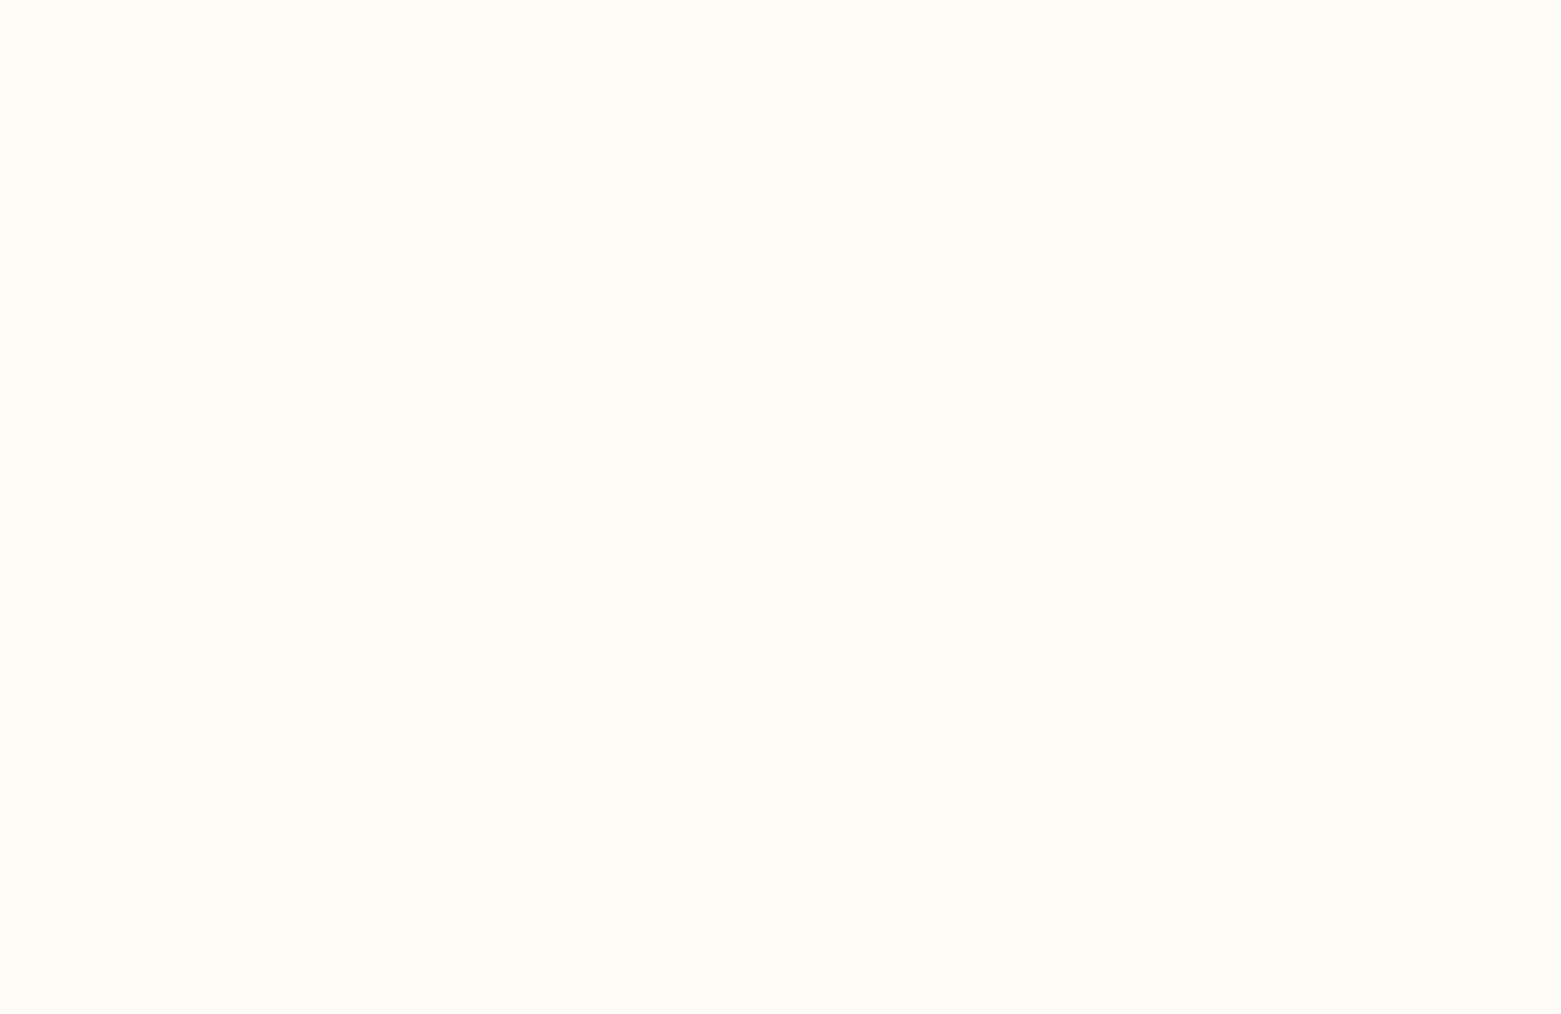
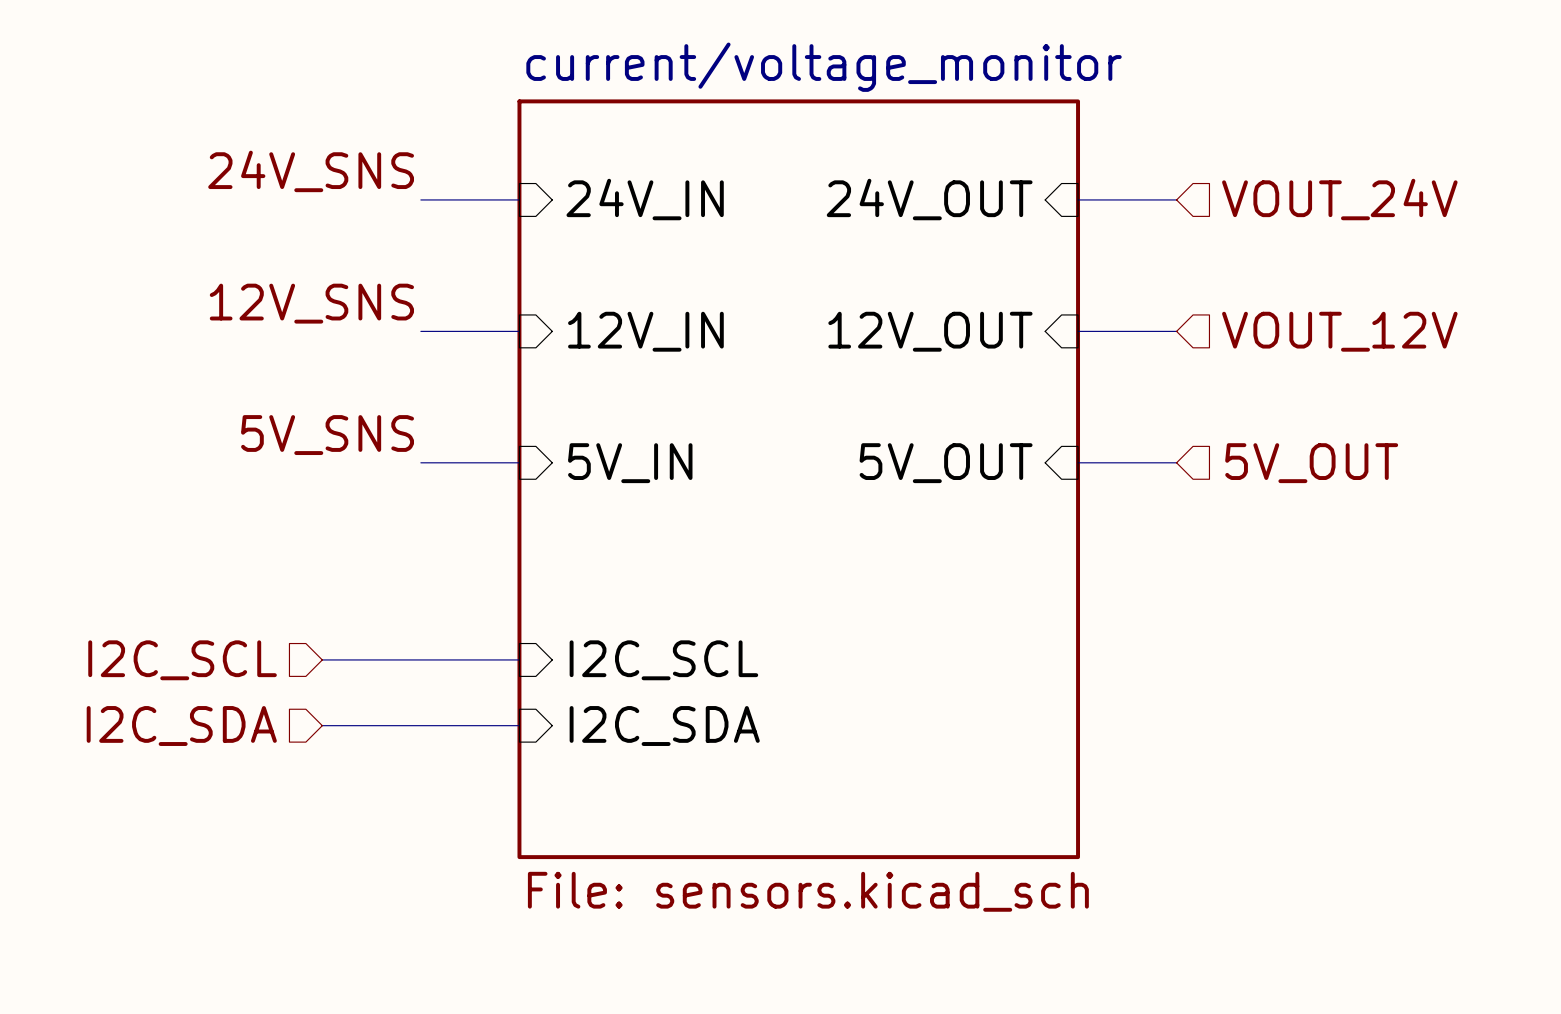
label: none -> 24V_SNS (311, 171)
wire: none -> (420, 199) (519, 199)
sheet pin: none -> 24V_IN (645, 199)
sheet pin: none -> 24V_OUT (929, 199)
wire: none -> (1078, 199) (1176, 199)
hierarchical label: none -> VOUT_24V (1339, 199)
label: none -> 12V_SNS (311, 303)
wire: none -> (420, 331) (519, 331)
sheet pin: none -> 12V_IN (645, 331)
sheet pin: none -> 12V_OUT (930, 331)
wire: none -> (1078, 331) (1176, 331)
hierarchical label: none -> VOUT_12V (1339, 331)
label: none -> 5V_SNS (327, 435)
wire: none -> (420, 462) (519, 462)
wire: none -> (1078, 462) (1176, 462)
sheet pin: none -> 5V_IN (630, 463)
sheet pin: none -> 5V_OUT (946, 463)
hierarchical label: none -> 5V_OUT (1311, 463)
sheet current/voltage_monitor: none -> File: sensors.kicad_sch (798, 479)
wire: none -> (322, 659) (519, 659)
hierarchical label: none -> I2C_SCL (182, 660)
sheet pin: none -> I2C_SCL (663, 660)
wire: none -> (322, 725) (519, 725)
hierarchical label: none -> I2C_SDA (181, 726)
sheet pin: none -> I2C_SDA (664, 726)

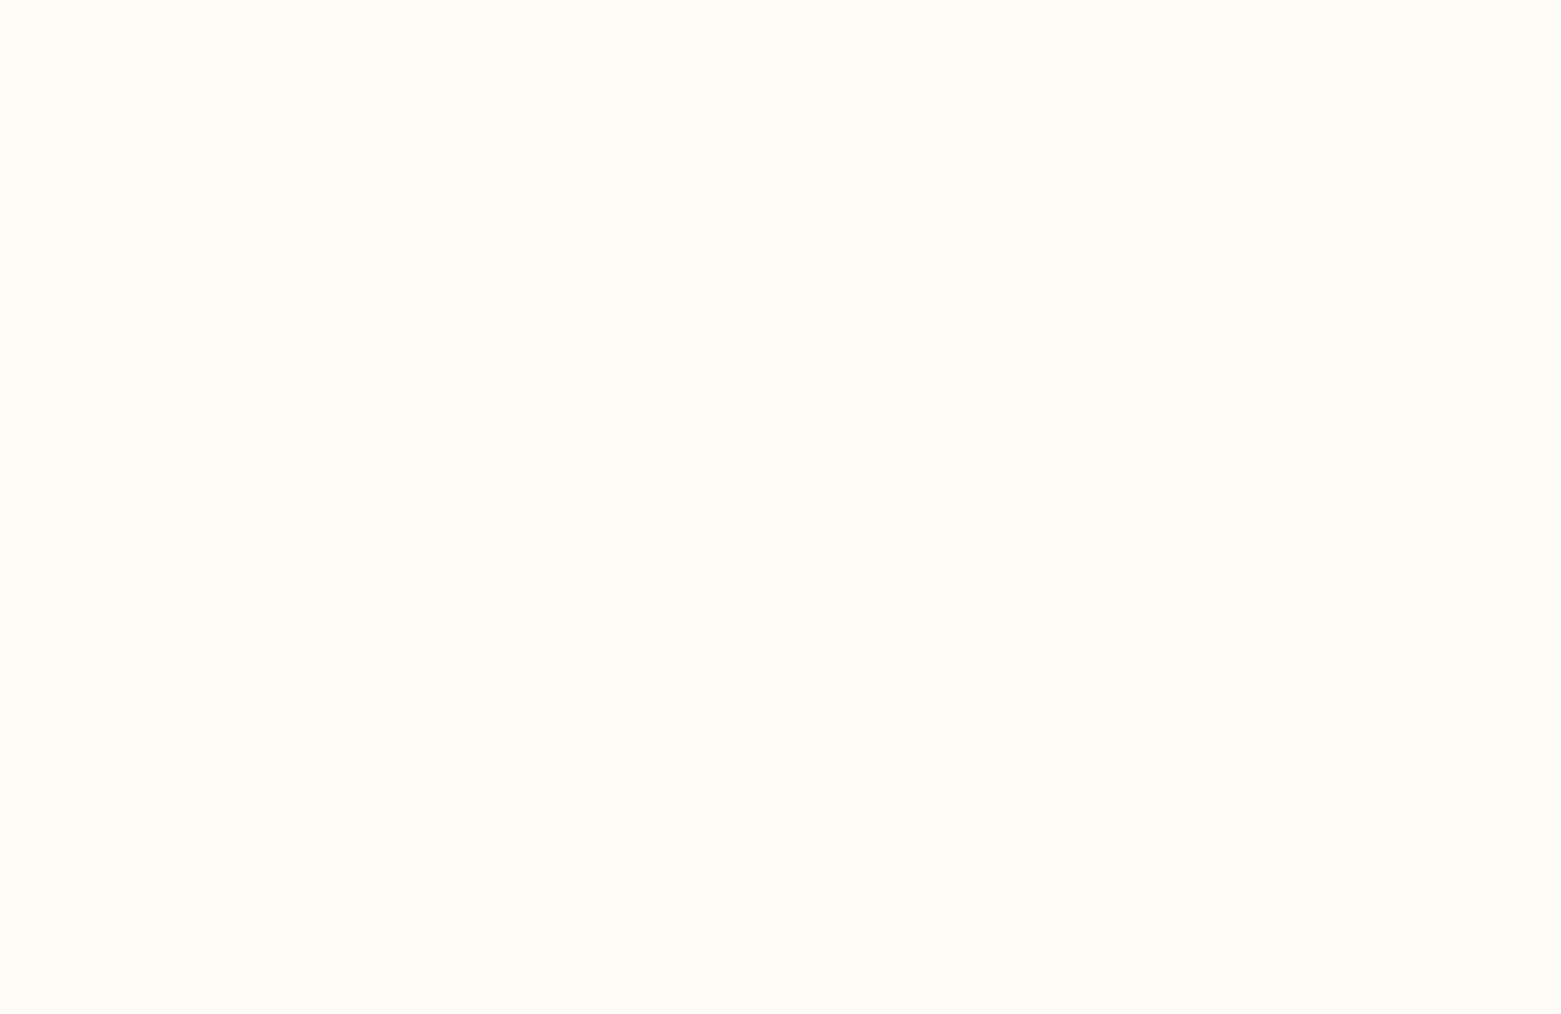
label: 24V_SNS (311, 171) -> none
wire: (420, 199) (519, 199) -> none
sheet pin: 24V_IN (645, 199) -> none
sheet pin: 24V_OUT (929, 199) -> none
wire: (1078, 199) (1176, 199) -> none
hierarchical label: VOUT_24V (1339, 199) -> none
label: 12V_SNS (311, 303) -> none
wire: (420, 331) (519, 331) -> none
sheet pin: 12V_IN (645, 331) -> none
sheet pin: 12V_OUT (930, 331) -> none
wire: (1078, 331) (1176, 331) -> none
hierarchical label: VOUT_12V (1339, 331) -> none
label: 5V_SNS (327, 435) -> none
wire: (420, 462) (519, 462) -> none
wire: (1078, 462) (1176, 462) -> none
sheet pin: 5V_IN (630, 463) -> none
sheet pin: 5V_OUT (946, 463) -> none
hierarchical label: 5V_OUT (1311, 463) -> none
sheet current/voltage_monitor: File: sensors.kicad_sch (798, 479) -> none
wire: (322, 659) (519, 659) -> none
hierarchical label: I2C_SCL (182, 660) -> none
sheet pin: I2C_SCL (663, 660) -> none
wire: (322, 725) (519, 725) -> none
hierarchical label: I2C_SDA (181, 726) -> none
sheet pin: I2C_SDA (664, 726) -> none

